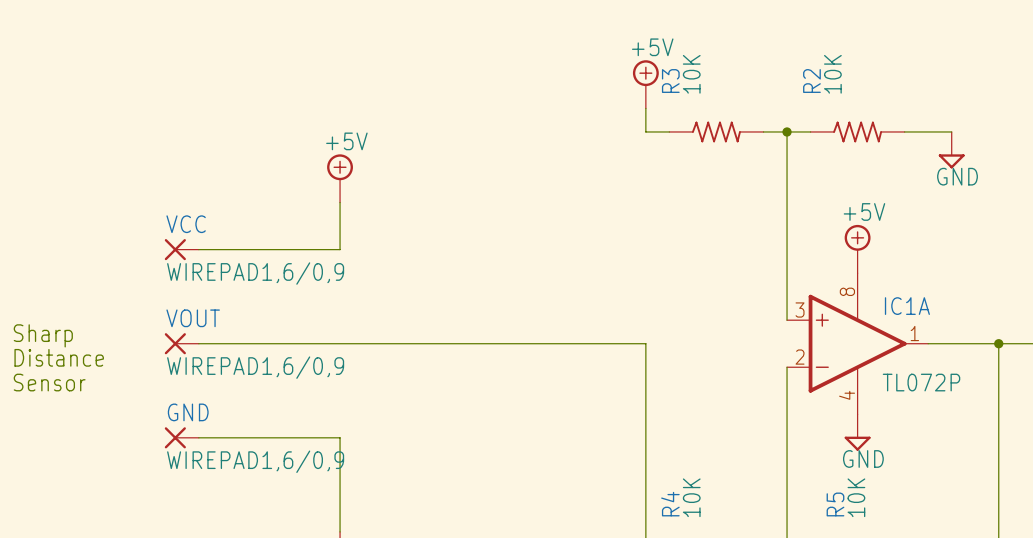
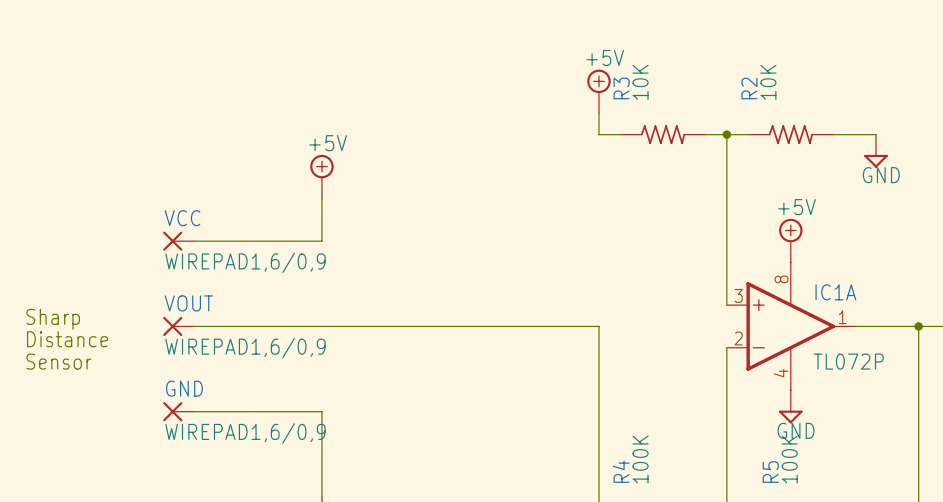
R4 value: 10K (691, 497) -> 100K (640, 459)
R5 value: 10K (856, 497) -> 100K (789, 459)

